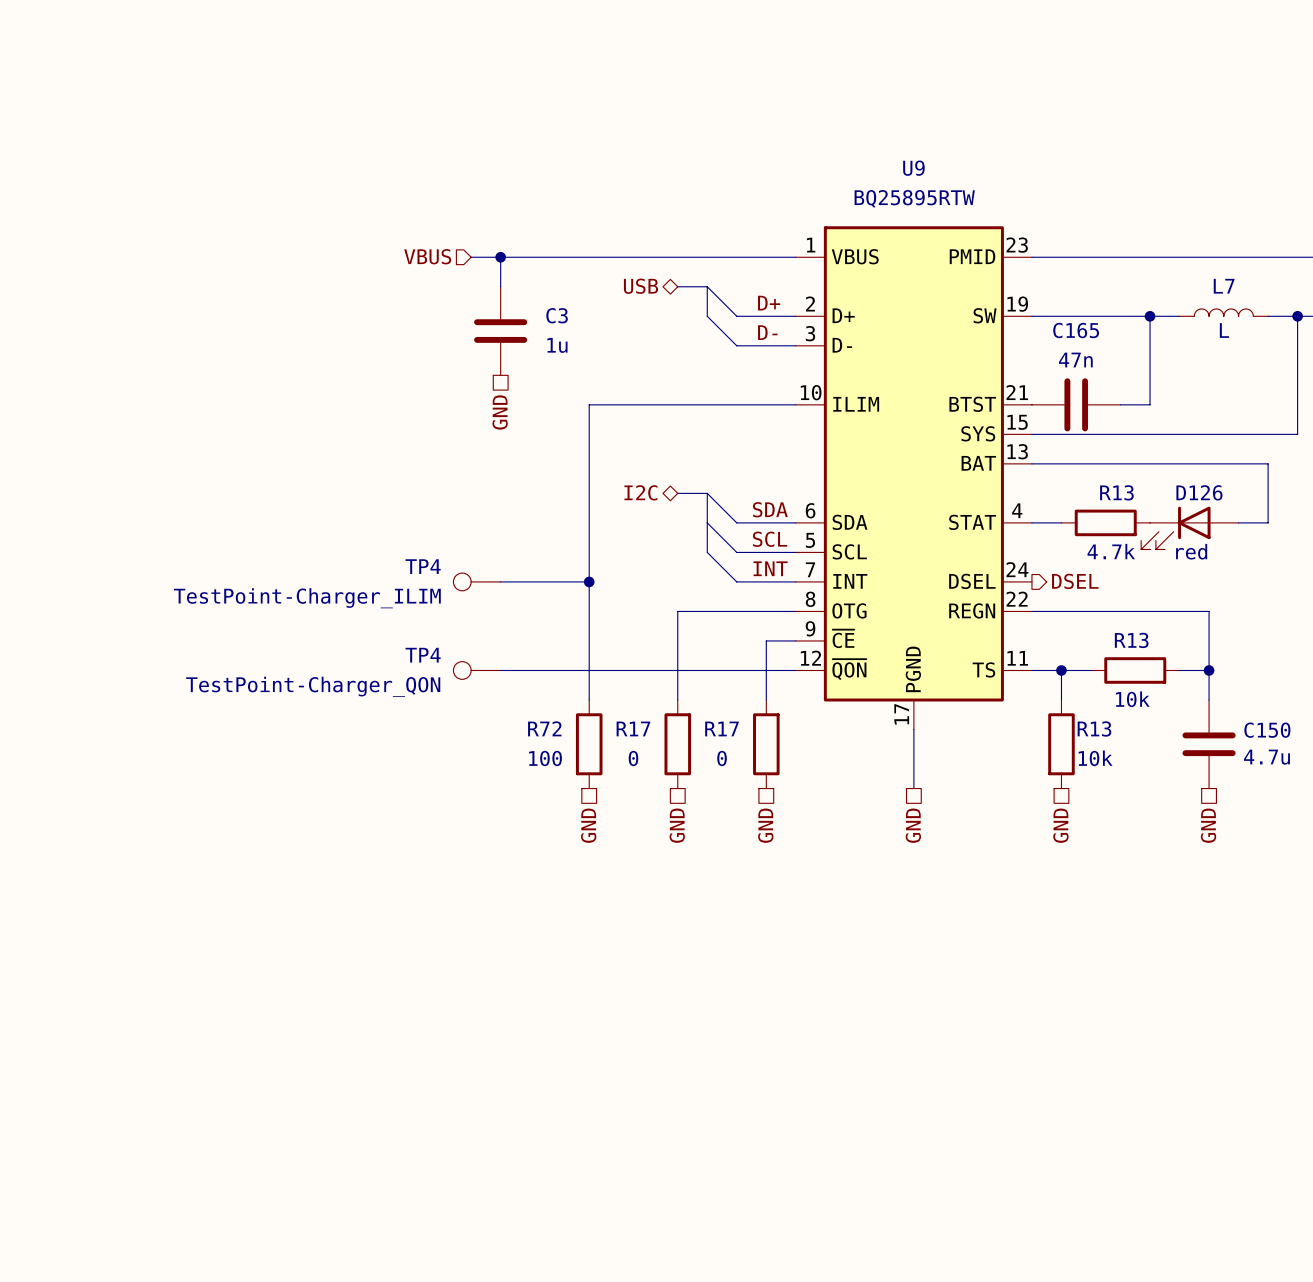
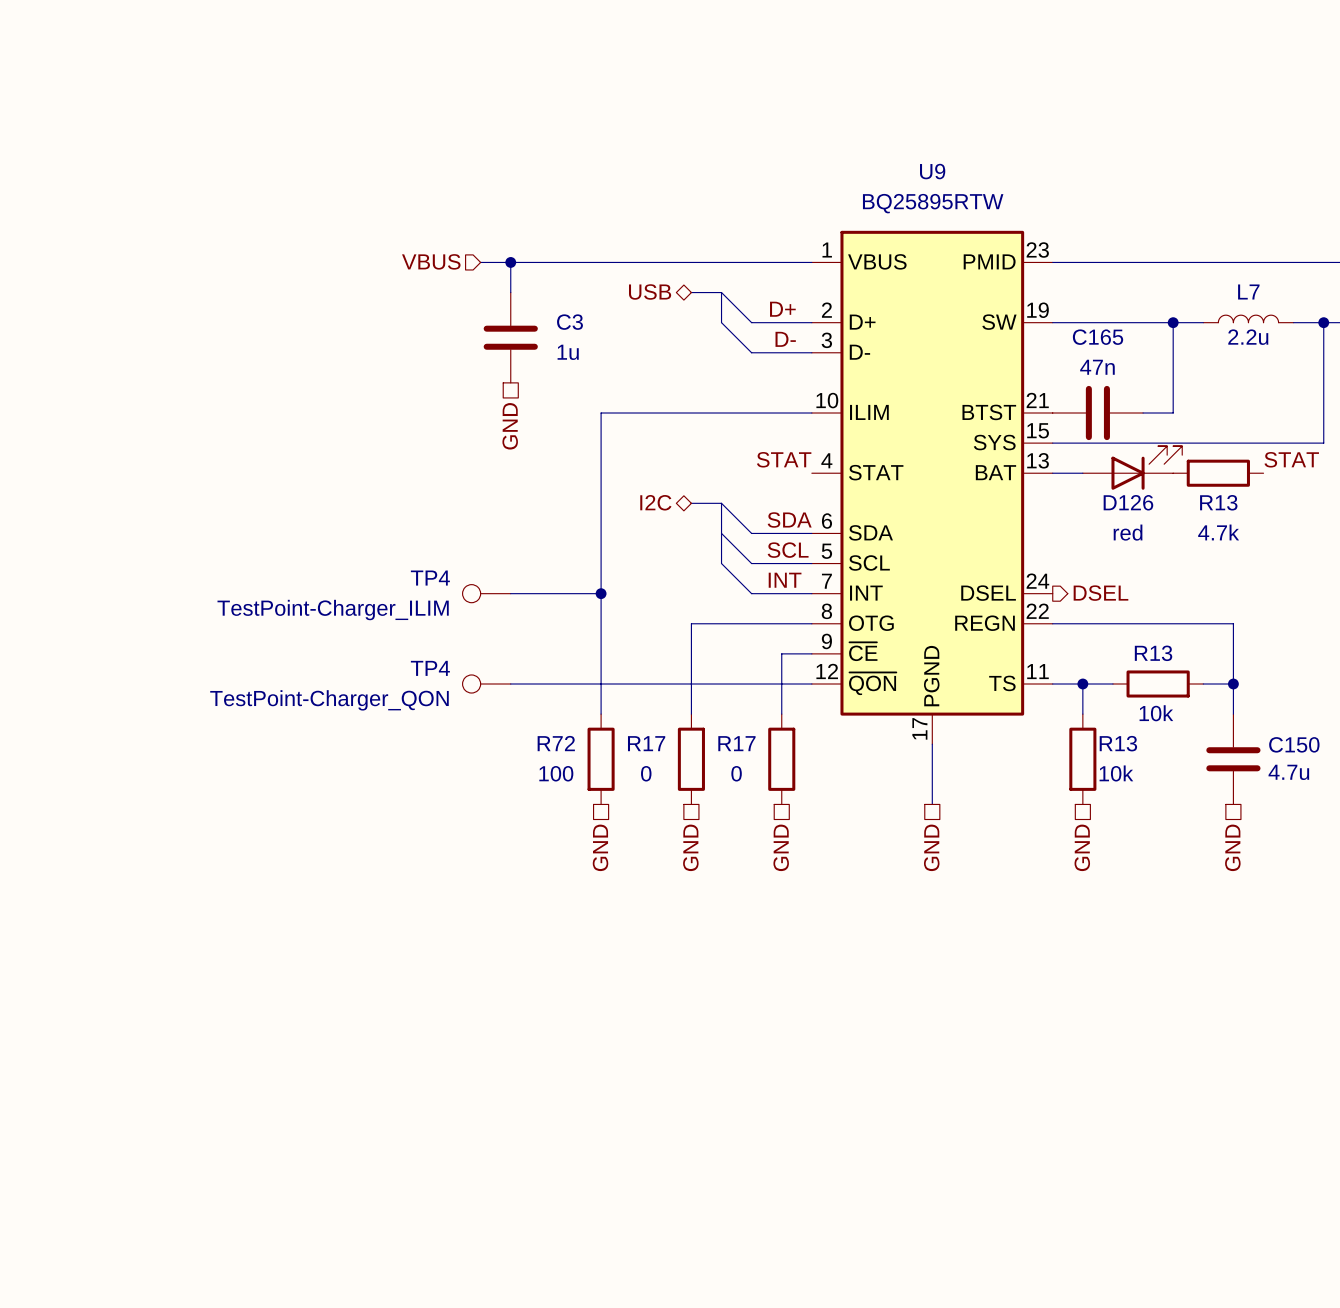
U9 symbol: [795, 226, 1032, 730] -> [811, 230, 1053, 745]
L7 value: L (1224, 330) -> 2.2u (1248, 337)
label: none -> STAT (784, 459)
label: none -> STAT (1291, 459)
wire: (1061, 463) (1268, 463) (1268, 522) (1238, 522) -> none
R13 name position: R13 (1116, 492) -> R13 (1218, 502)
wire: (1031, 522) (1061, 522) -> none
R13 position: (1105, 522) -> (1218, 473)
D126 rotation: 0° (1175, 528) -> 180° (1146, 467)
D126 position: (1189, 528) -> (1132, 467)
R13 value position: 4.7k (1111, 551) -> 4.7k (1218, 532)
D126 value position: red (1191, 551) -> red (1128, 532)

